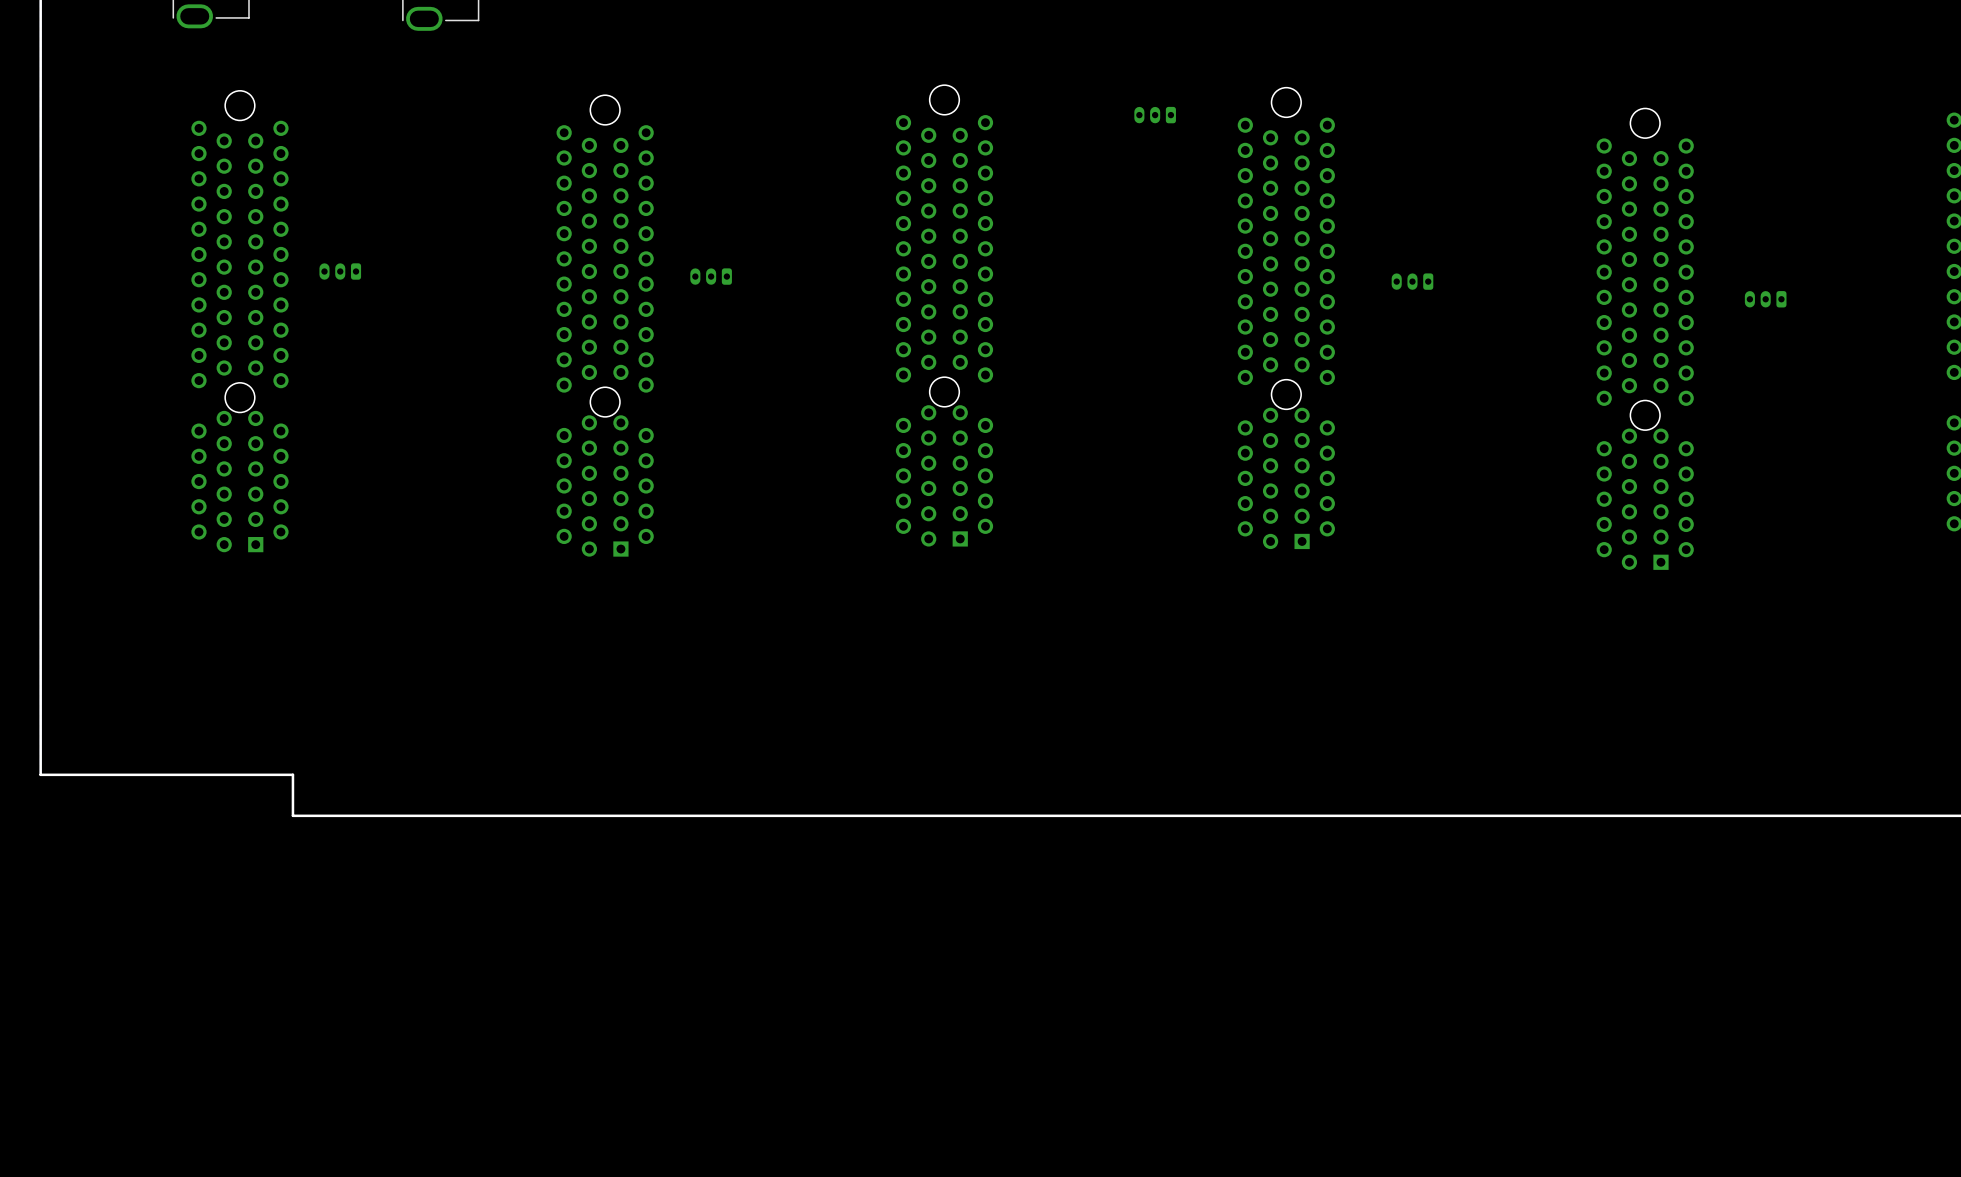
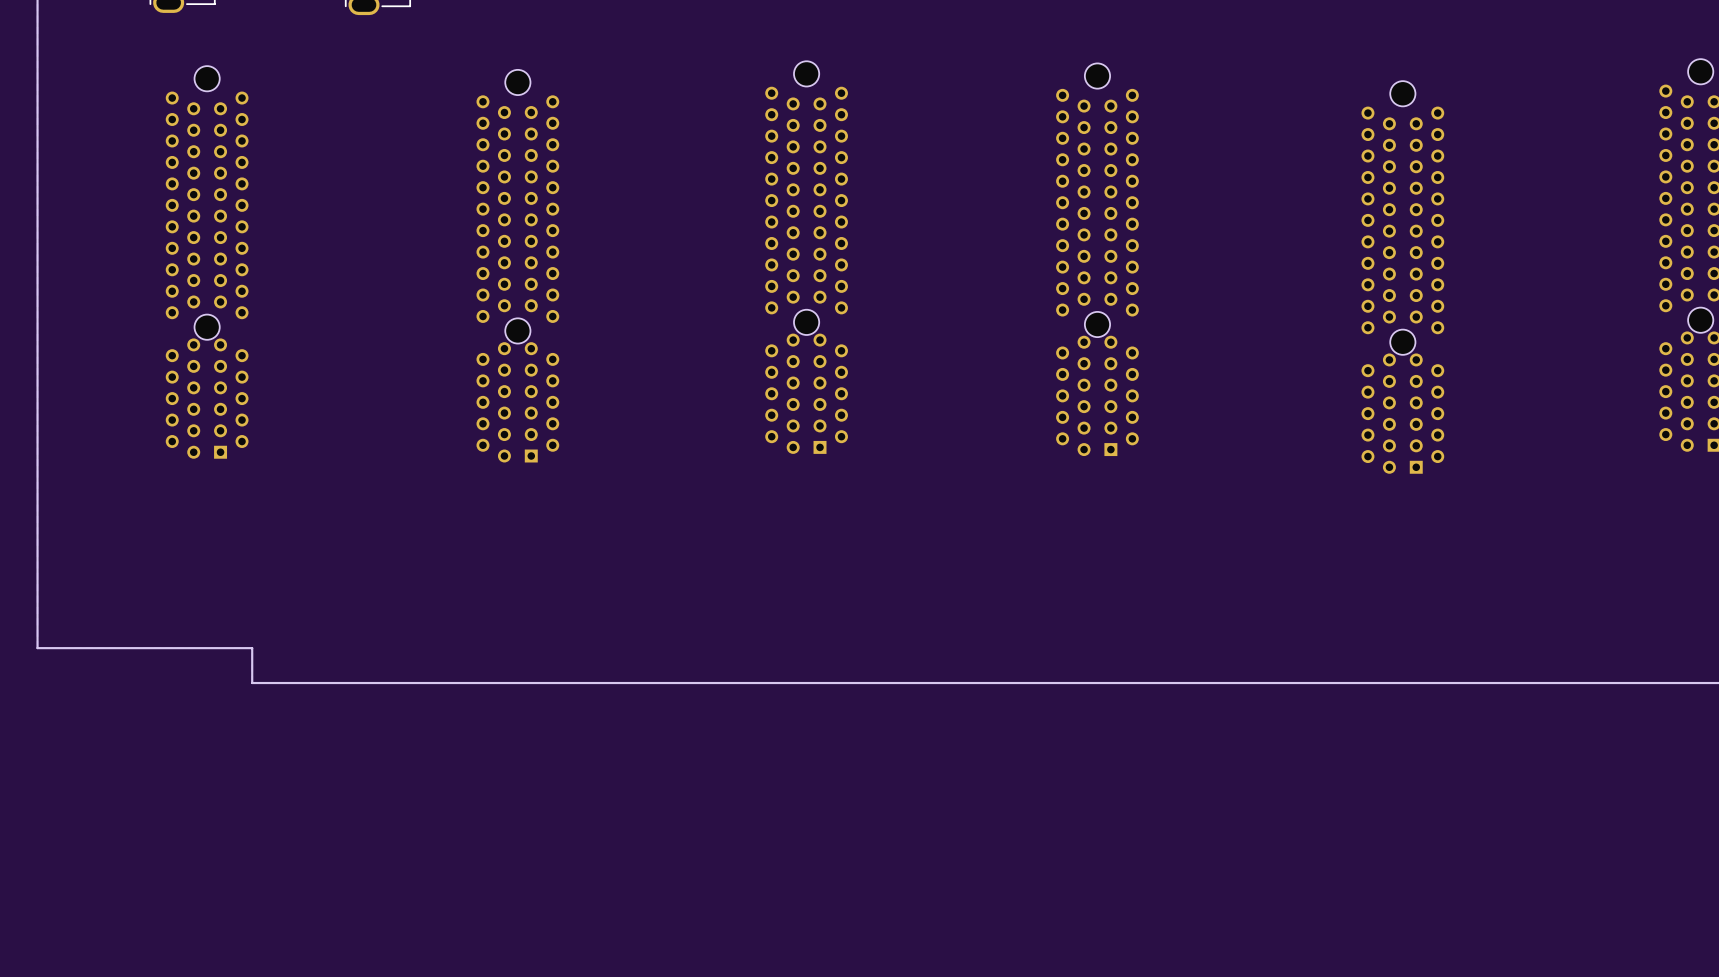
part: (1155, 115) -> none
part: (340, 271) -> none
part: (711, 276) -> none
part: (1412, 281) -> none
part: (1765, 299) -> none

